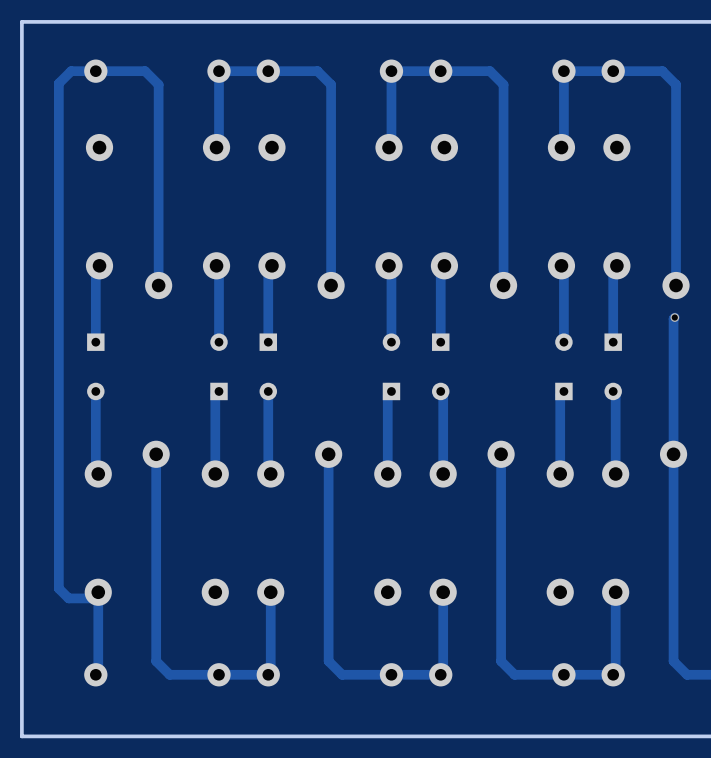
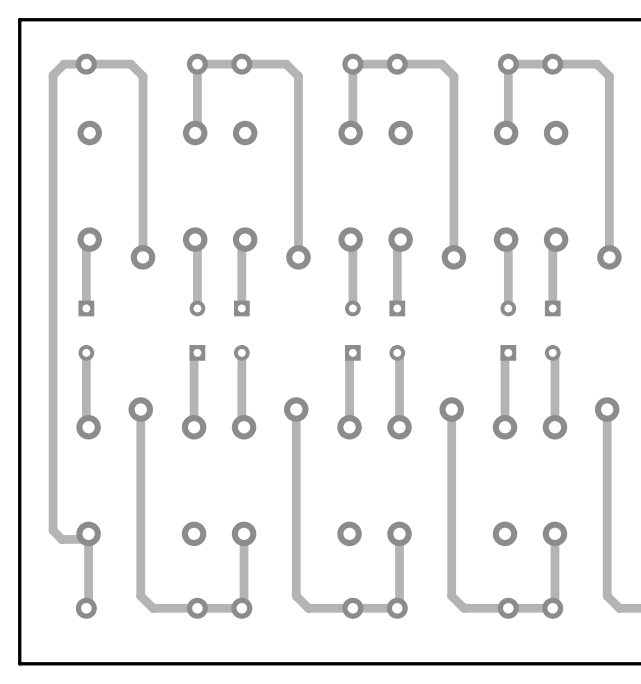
track: (674, 317) (673, 454) -> none
via: (674, 317) -> none

